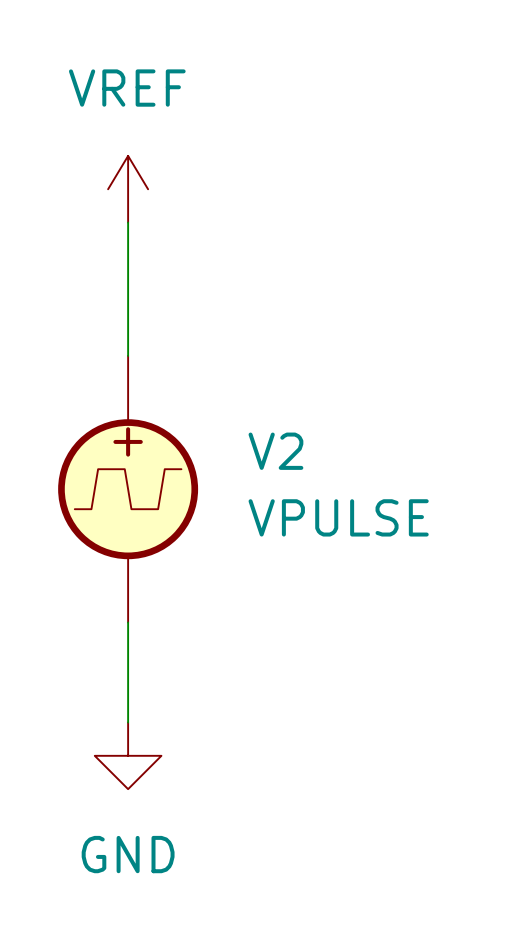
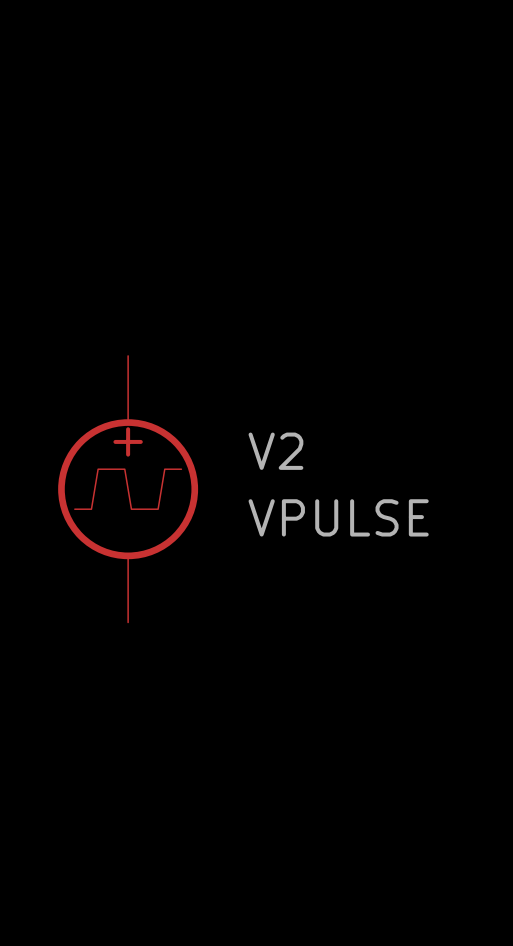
power symbol: VREF (128, 189) -> none
wire: (128, 222) (128, 355) -> none
wire: (128, 622) (128, 722) -> none
power symbol: GND (128, 755) -> none

